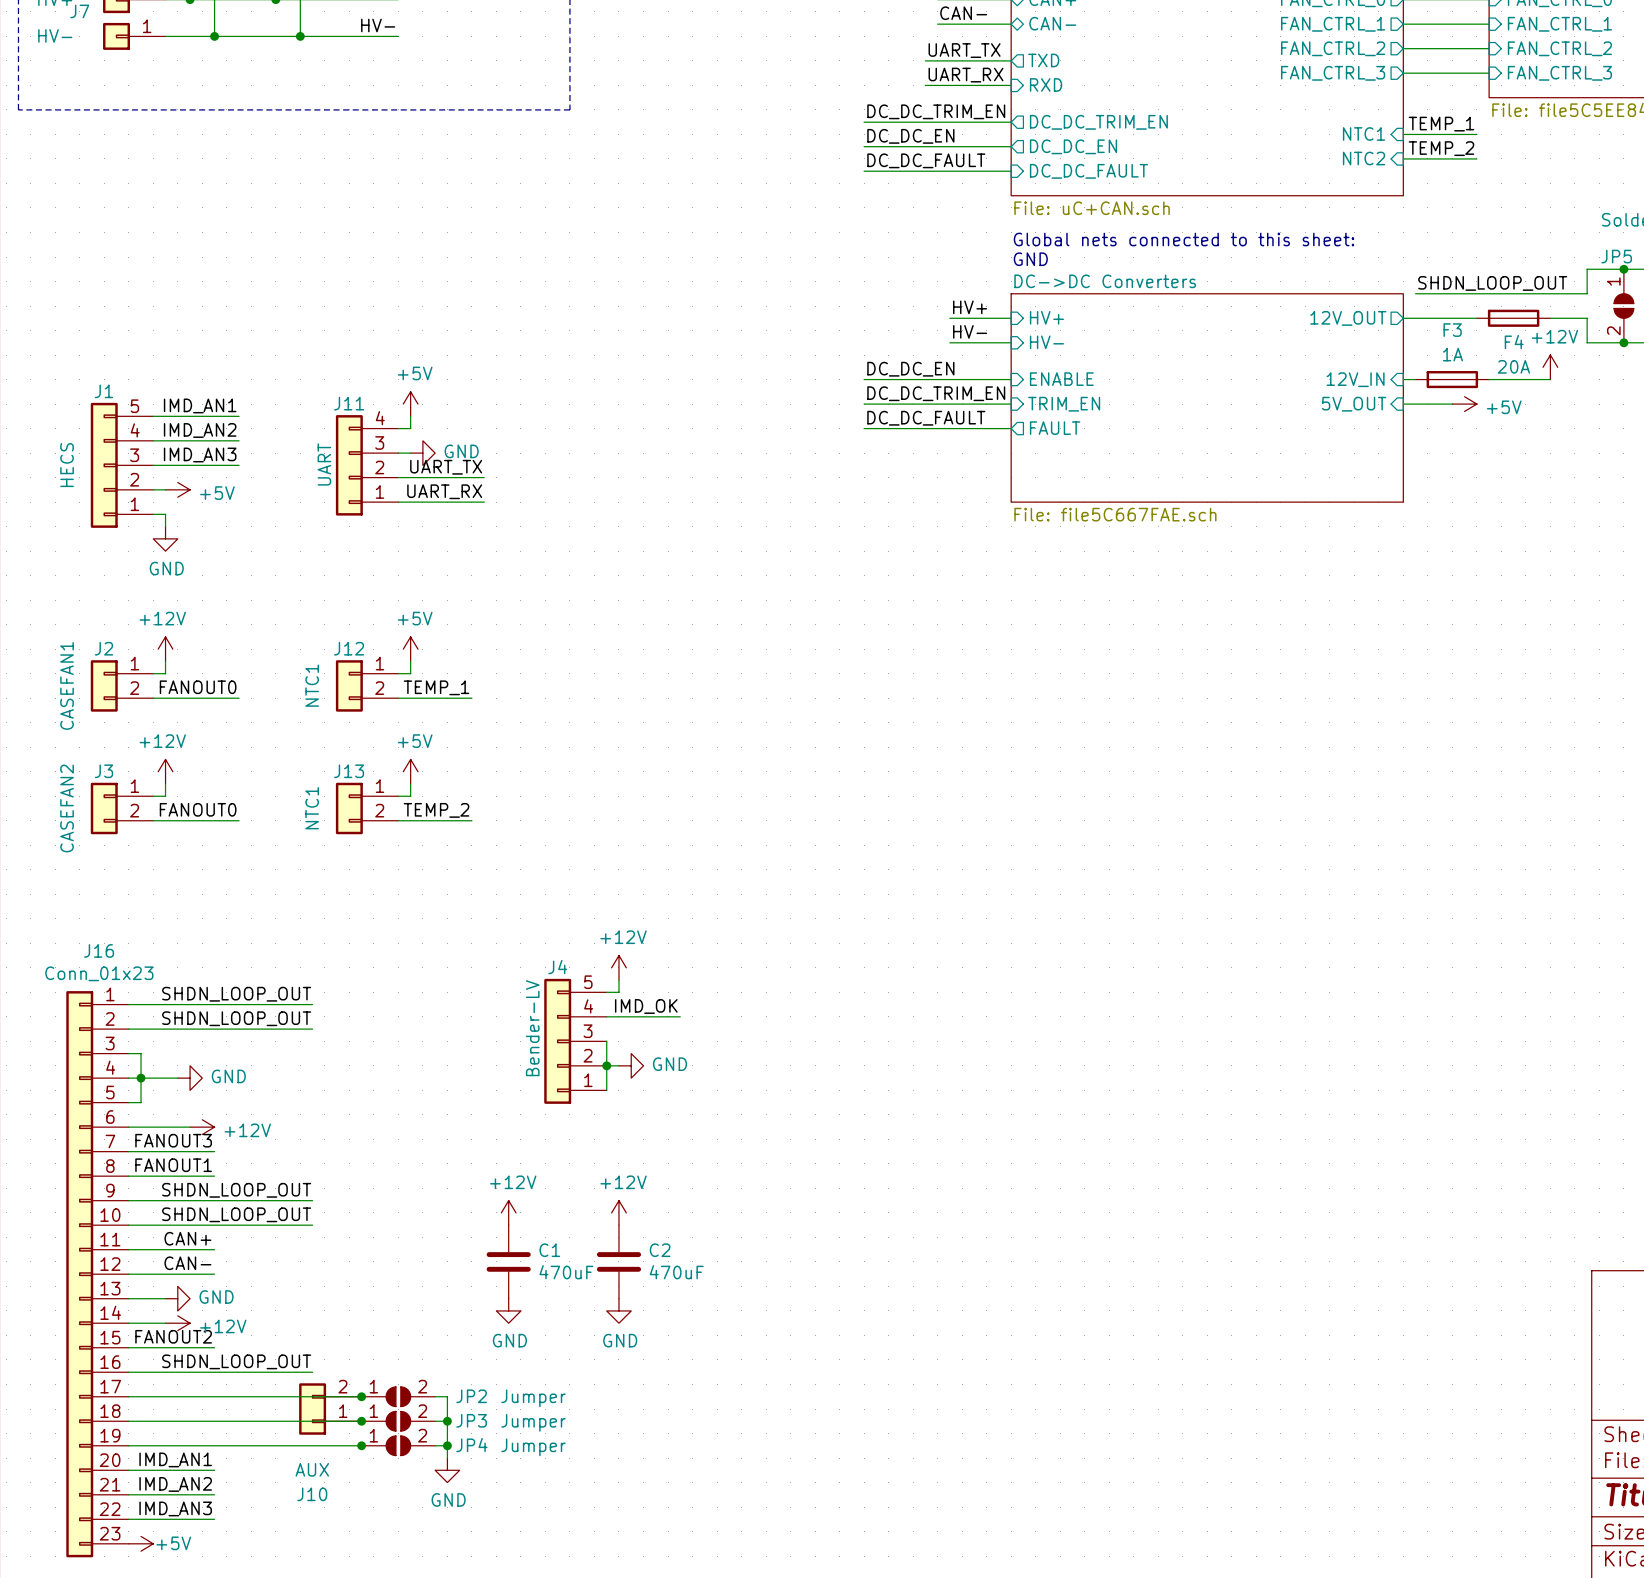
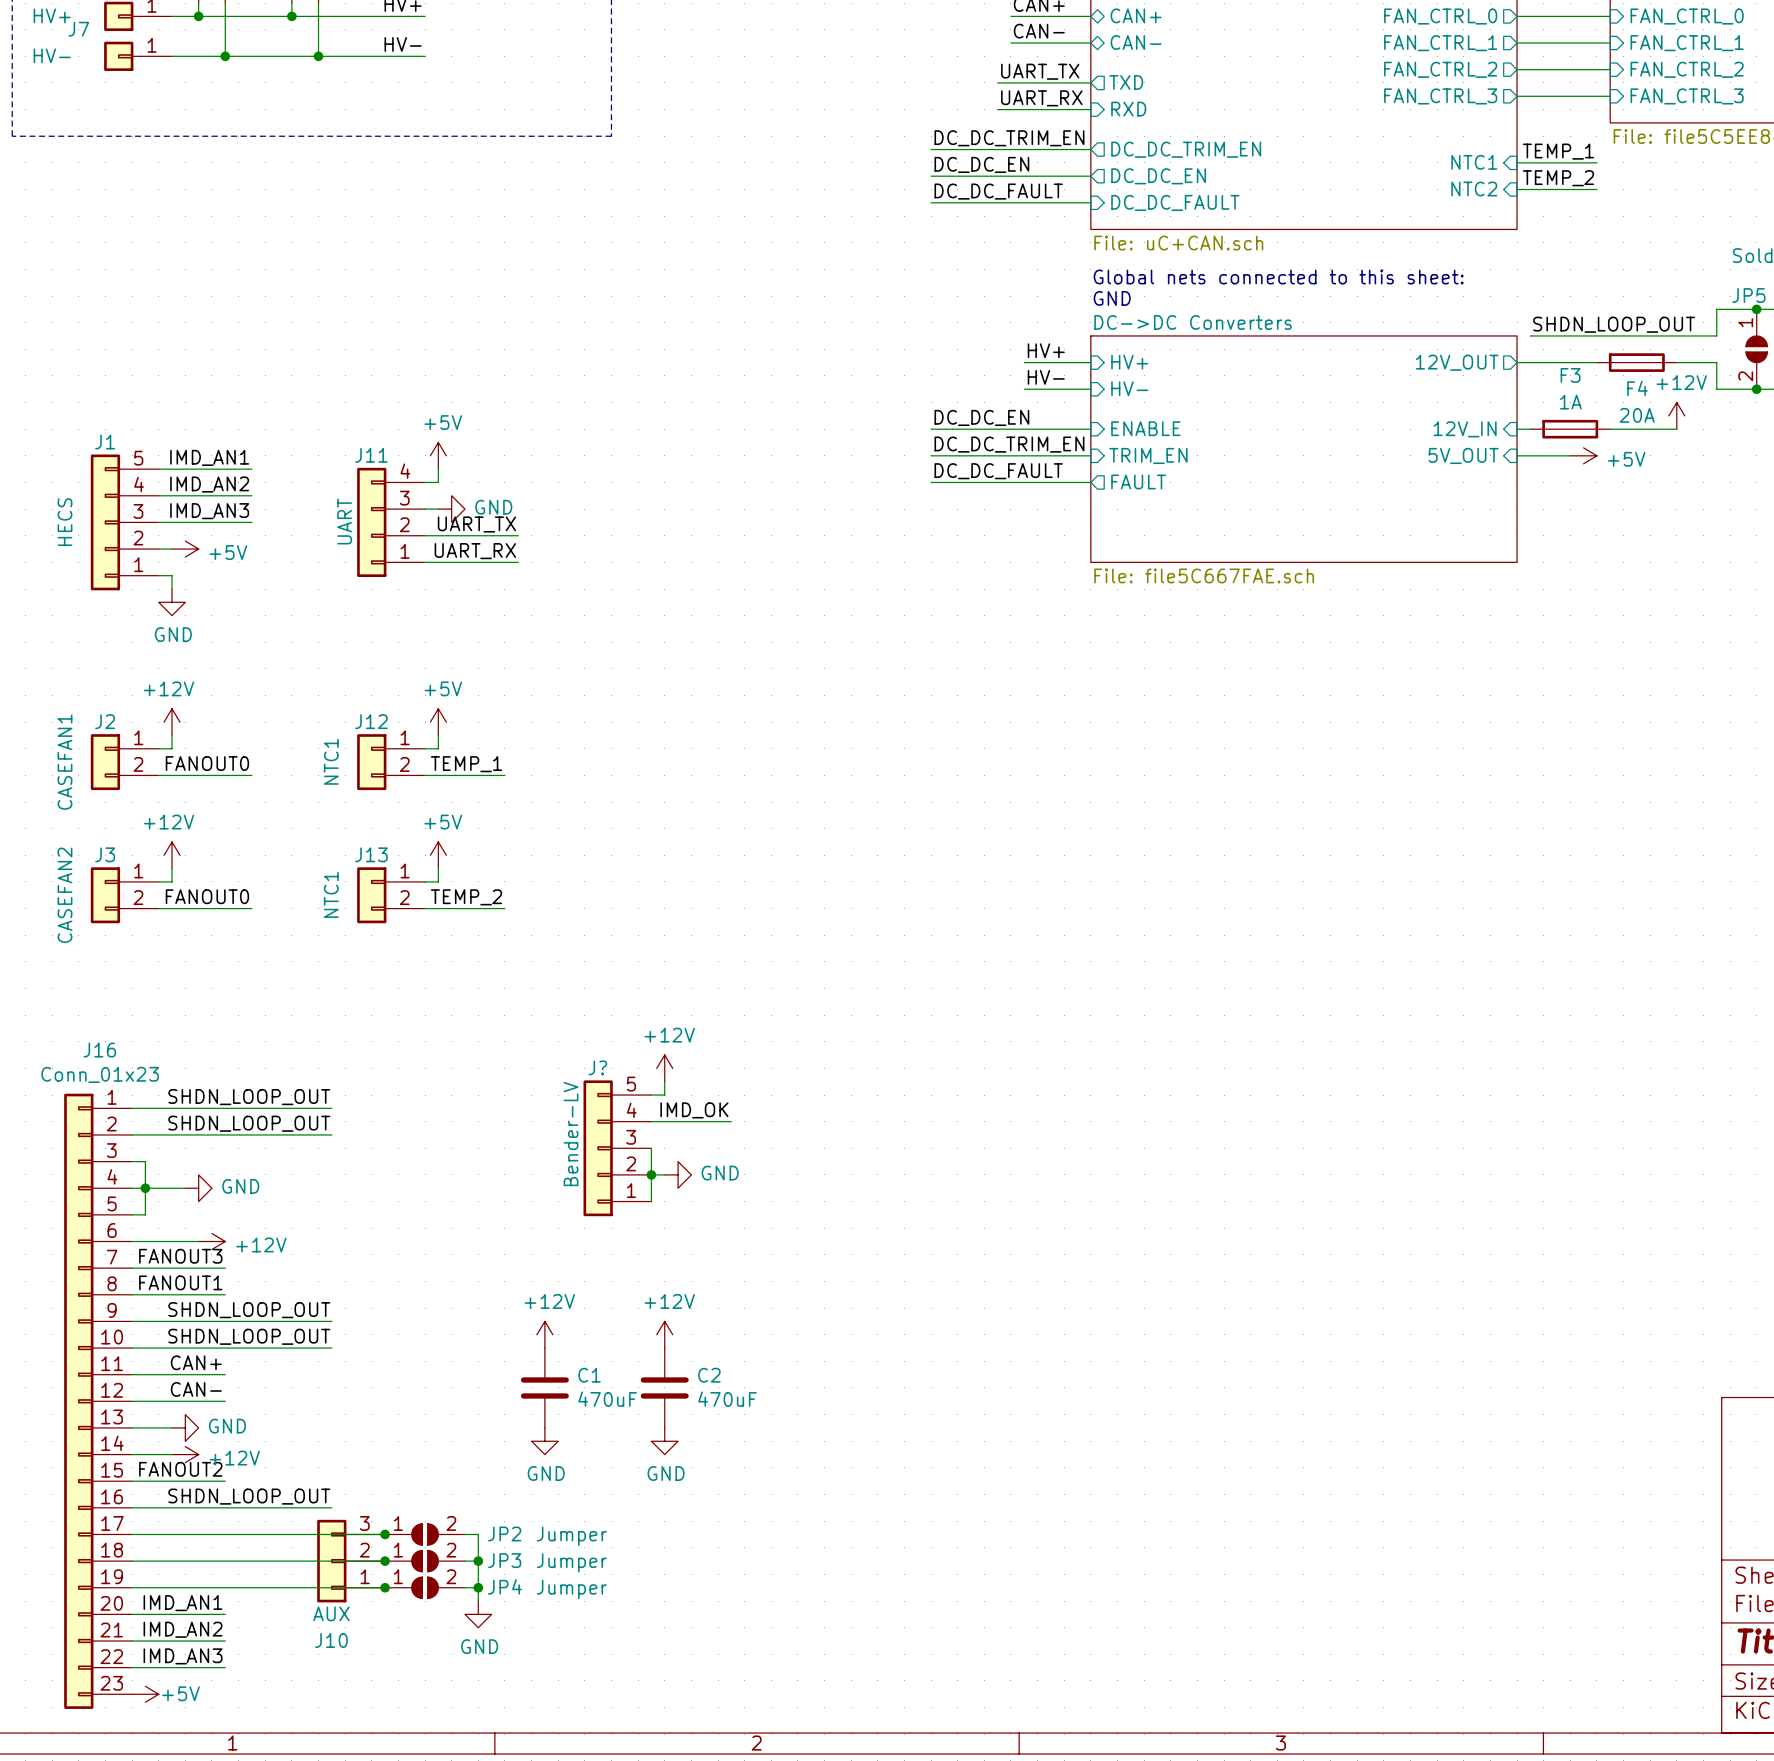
J4 name: J4 (557, 967) -> J? (597, 1067)
J10 symbol: [299, 1383, 362, 1435] -> [317, 1519, 386, 1603]

